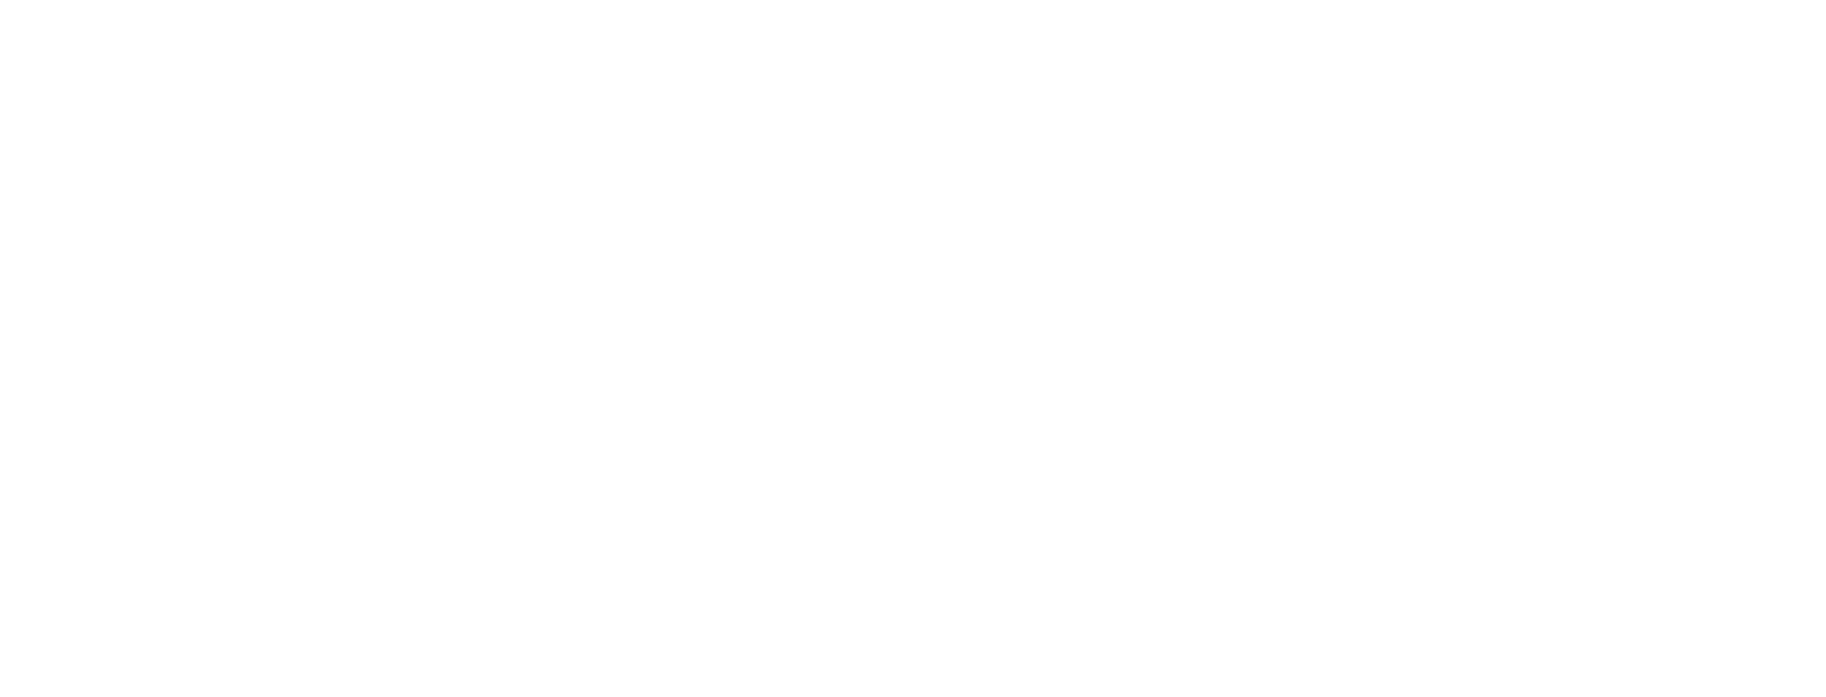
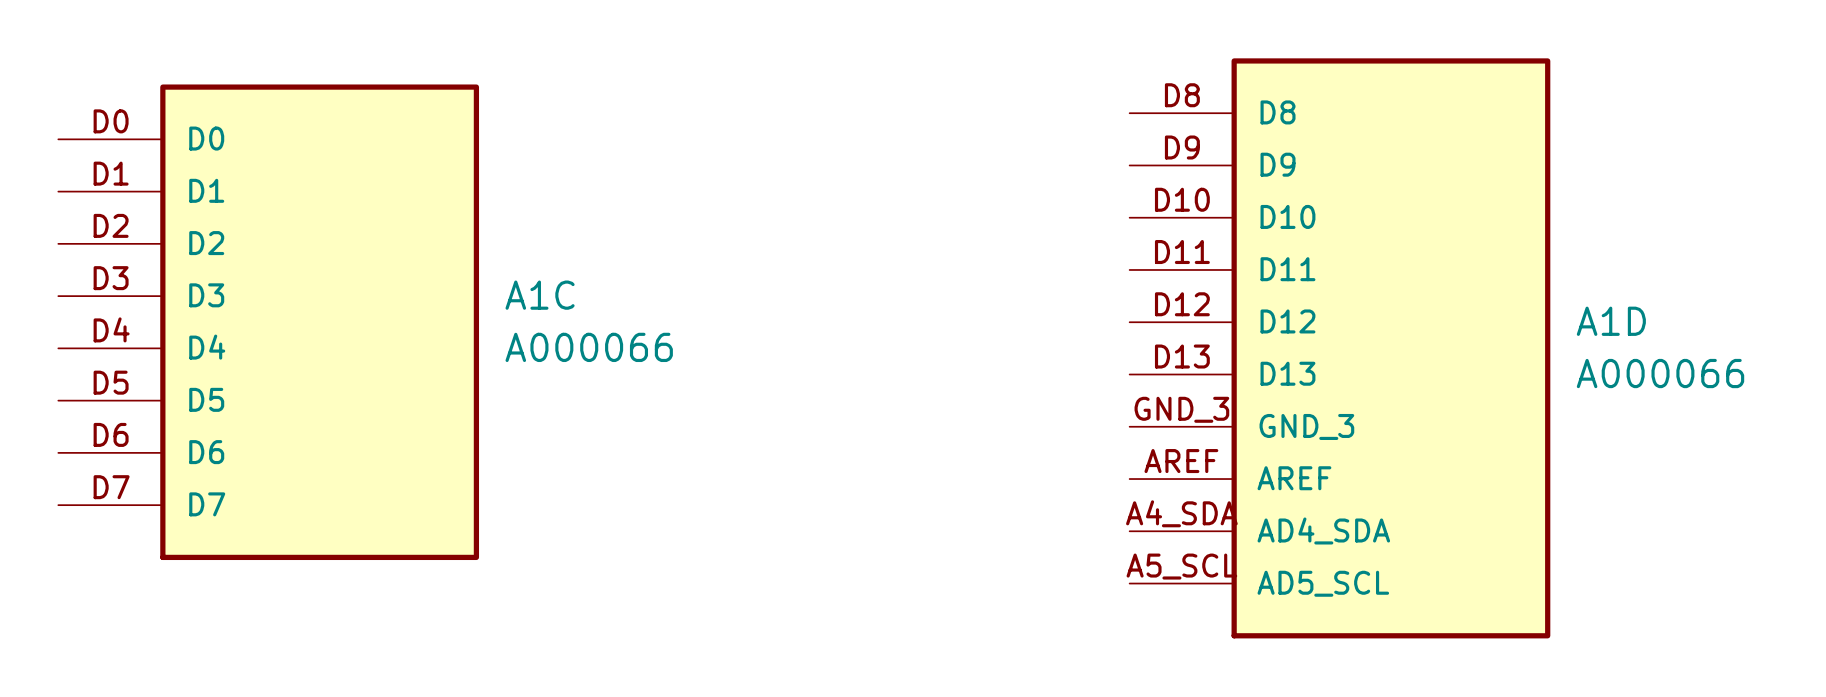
A1C: none -> A000066 (268, 322)
A1D: none -> A000066 (1339, 348)

